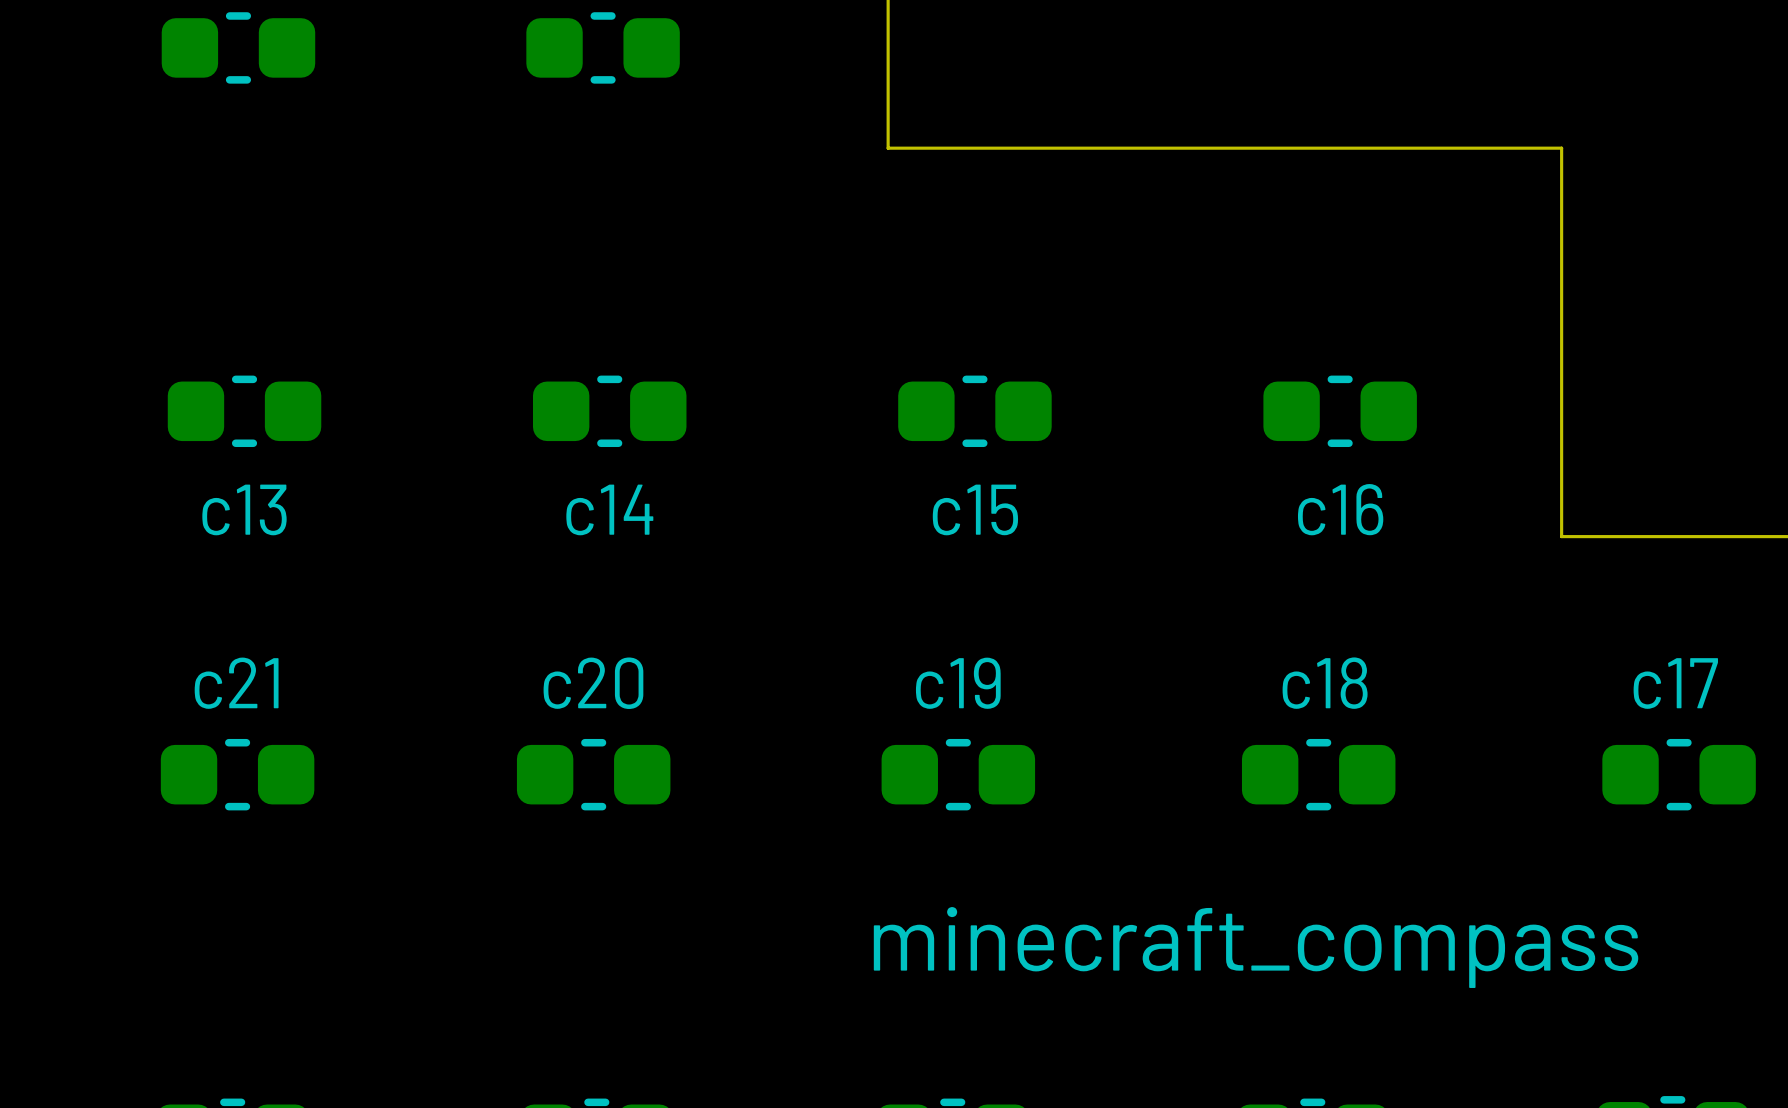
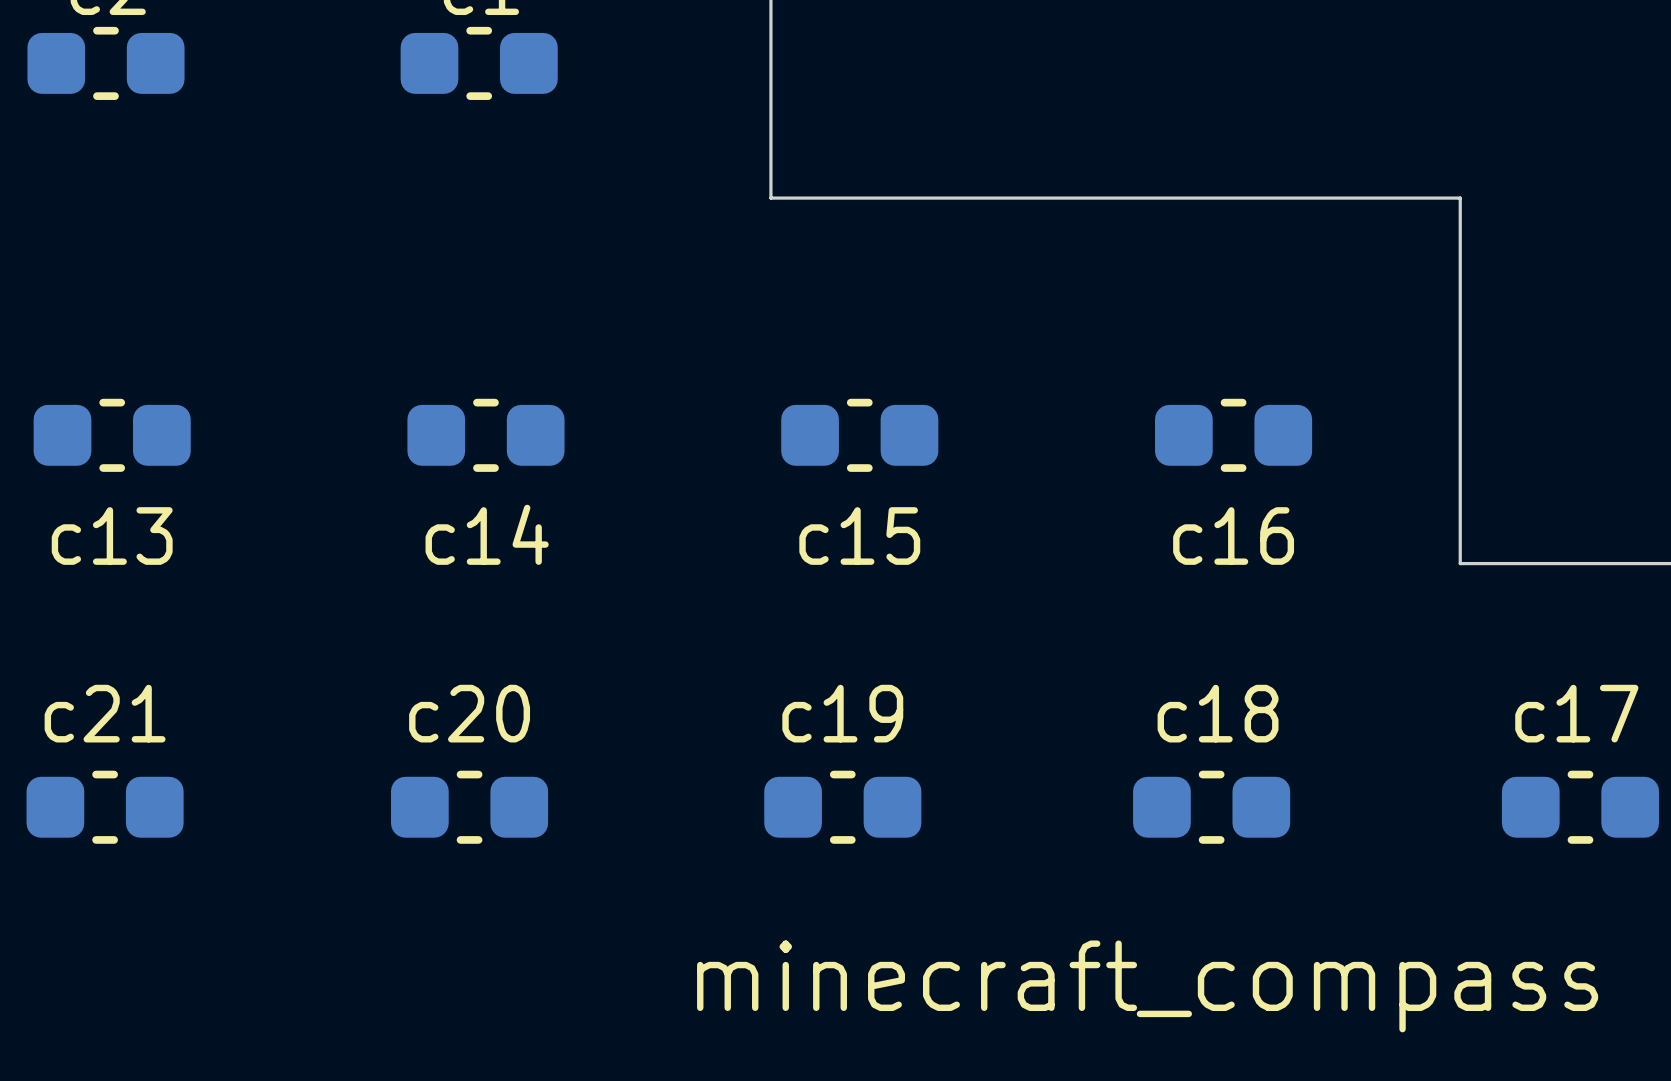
board edge: (888, 148) (1561, 148) (1561, 179) -> (770, 166) (770, 198) (1460, 198)

